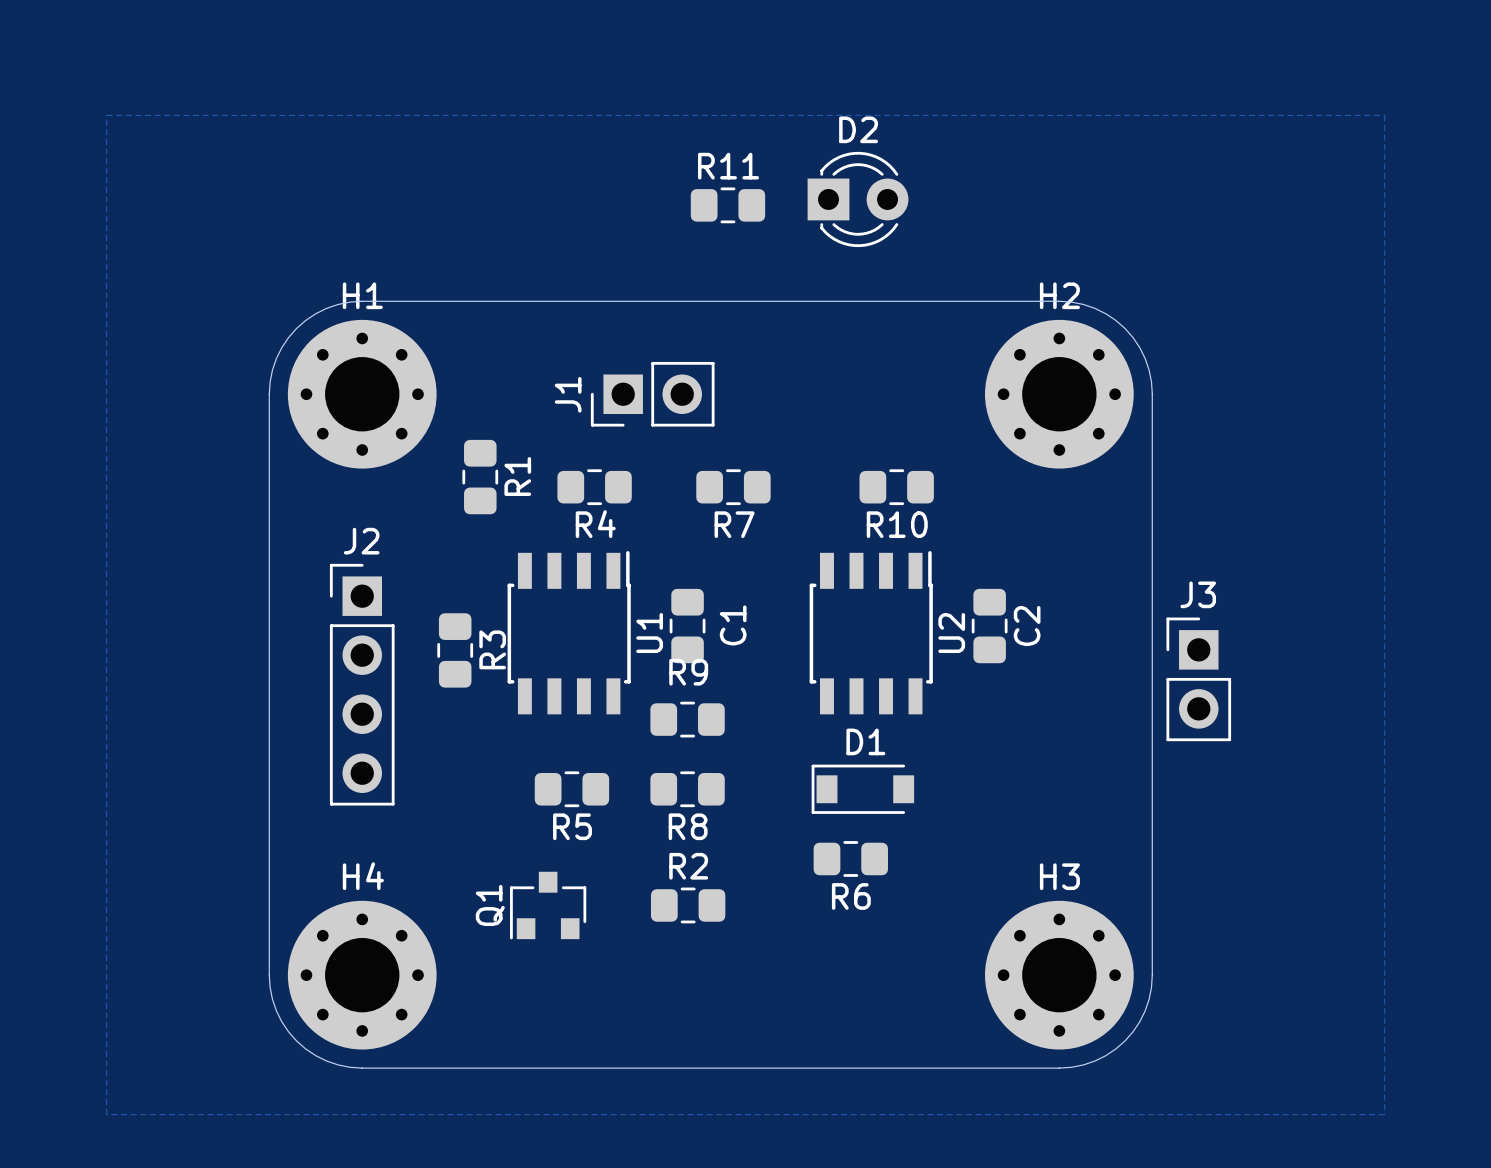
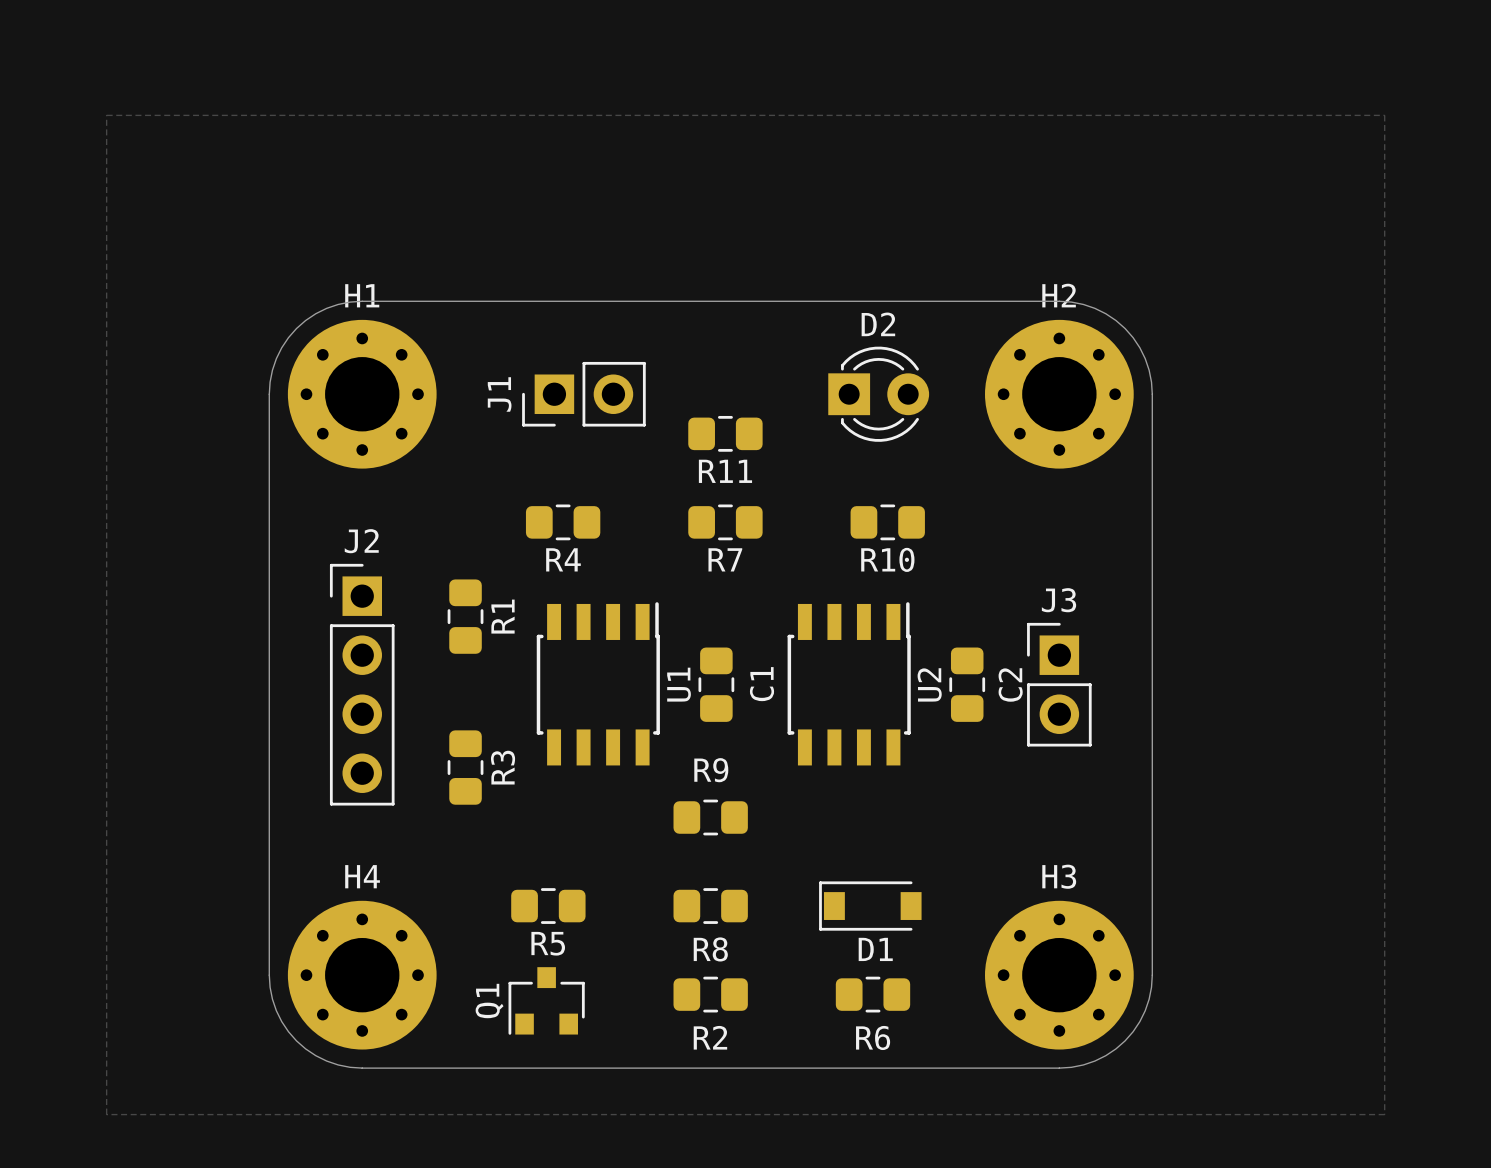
R11 name position: R11 (728, 166) -> R11 (725, 471)
D2 position: (858, 199) -> (878, 394)
R11 position: (727, 205) -> (725, 433)
J1 position: (652, 394) -> (583, 394)
R1 position: (480, 477) -> (465, 616)
R4 position: (594, 487) -> (563, 522)
R7 position: (733, 487) -> (725, 522)
R10 position: (896, 487) -> (887, 522)
C1 position: (687, 626) -> (716, 684)
C2 position: (989, 626) -> (967, 684)
C2 name position: C2 (1027, 626) -> C2 (1010, 684)
U1 position: (569, 632) -> (598, 683)
U2 position: (871, 632) -> (849, 683)
R3 position: (455, 650) -> (465, 767)
J3 position: (1198, 679) -> (1059, 684)
R9 position: (687, 719) -> (710, 817)
D1 name position: D1 (865, 741) -> D1 (875, 949)
R5 position: (571, 789) -> (548, 906)
R8 position: (687, 789) -> (710, 906)
D1 position: (862, 789) -> (870, 906)
R8 name position: R8 (688, 826) -> R8 (710, 949)
R6 position: (850, 858) -> (872, 994)
R2 name position: R2 (688, 866) -> R2 (710, 1037)
R6 name position: R6 (851, 896) -> R6 (873, 1037)
Q1 position: (548, 905) -> (546, 1000)
R2 position: (688, 905) -> (710, 994)

